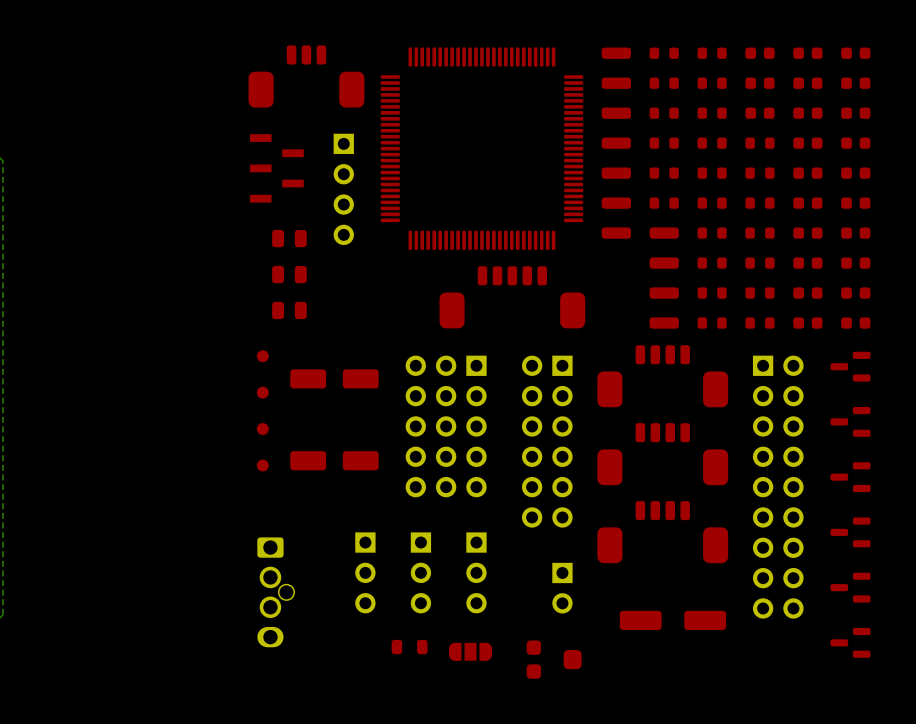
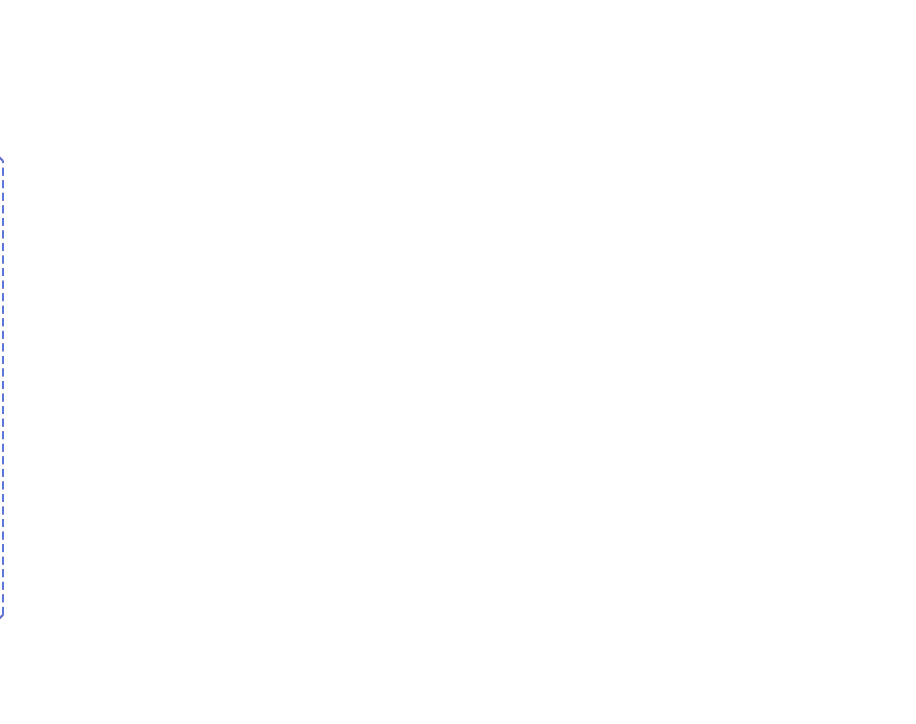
part: (616, 53) -> none
part: (664, 53) -> none
part: (712, 53) -> none
part: (760, 53) -> none
part: (807, 53) -> none
part: (855, 53) -> none
part: (306, 76) -> none
part: (616, 83) -> none
part: (664, 83) -> none
part: (712, 83) -> none
part: (760, 83) -> none
part: (807, 83) -> none
part: (855, 83) -> none
part: (616, 113) -> none
part: (664, 113) -> none
part: (712, 113) -> none
part: (760, 113) -> none
part: (807, 113) -> none
part: (855, 113) -> none
part: (616, 143) -> none
part: (664, 143) -> none
part: (712, 143) -> none
part: (760, 143) -> none
part: (807, 143) -> none
part: (855, 143) -> none
part: (481, 148) -> none
part: (276, 168) -> none
part: (616, 173) -> none
part: (664, 173) -> none
part: (712, 173) -> none
part: (760, 173) -> none
part: (807, 173) -> none
part: (855, 173) -> none
part: (343, 189) -> none
part: (616, 203) -> none
part: (664, 203) -> none
part: (712, 203) -> none
part: (760, 203) -> none
part: (807, 203) -> none
part: (855, 203) -> none
part: (616, 233) -> none
part: (664, 233) -> none
part: (712, 233) -> none
part: (760, 233) -> none
part: (807, 233) -> none
part: (855, 233) -> none
part: (289, 238) -> none
part: (664, 263) -> none
part: (712, 263) -> none
part: (760, 263) -> none
part: (807, 263) -> none
part: (855, 263) -> none
part: (289, 274) -> none
part: (664, 293) -> none
part: (712, 293) -> none
part: (760, 293) -> none
part: (807, 293) -> none
part: (855, 293) -> none
part: (512, 297) -> none
part: (289, 310) -> none
part: (664, 323) -> none
part: (712, 323) -> none
part: (760, 323) -> none
part: (807, 323) -> none
part: (855, 323) -> none
part: (262, 356) -> none
part: (850, 366) -> none
part: (662, 376) -> none
part: (334, 378) -> none
part: (262, 392) -> none
part: (850, 421) -> none
part: (446, 426) -> none
part: (262, 429) -> none
part: (547, 441) -> none
part: (662, 454) -> none
part: (334, 460) -> none
part: (262, 465) -> none
part: (850, 477) -> none
part: (778, 487) -> none
part: (662, 532) -> none
part: (850, 532) -> none
part: (365, 572) -> none
part: (420, 572) -> none
part: (476, 572) -> none
part: (850, 587) -> none
part: (562, 588) -> none
part: (275, 592) -> none
part: (672, 620) -> none
part: (850, 642) -> none
part: (409, 647) -> none
part: (470, 651) -> none
part: (554, 659) -> none

